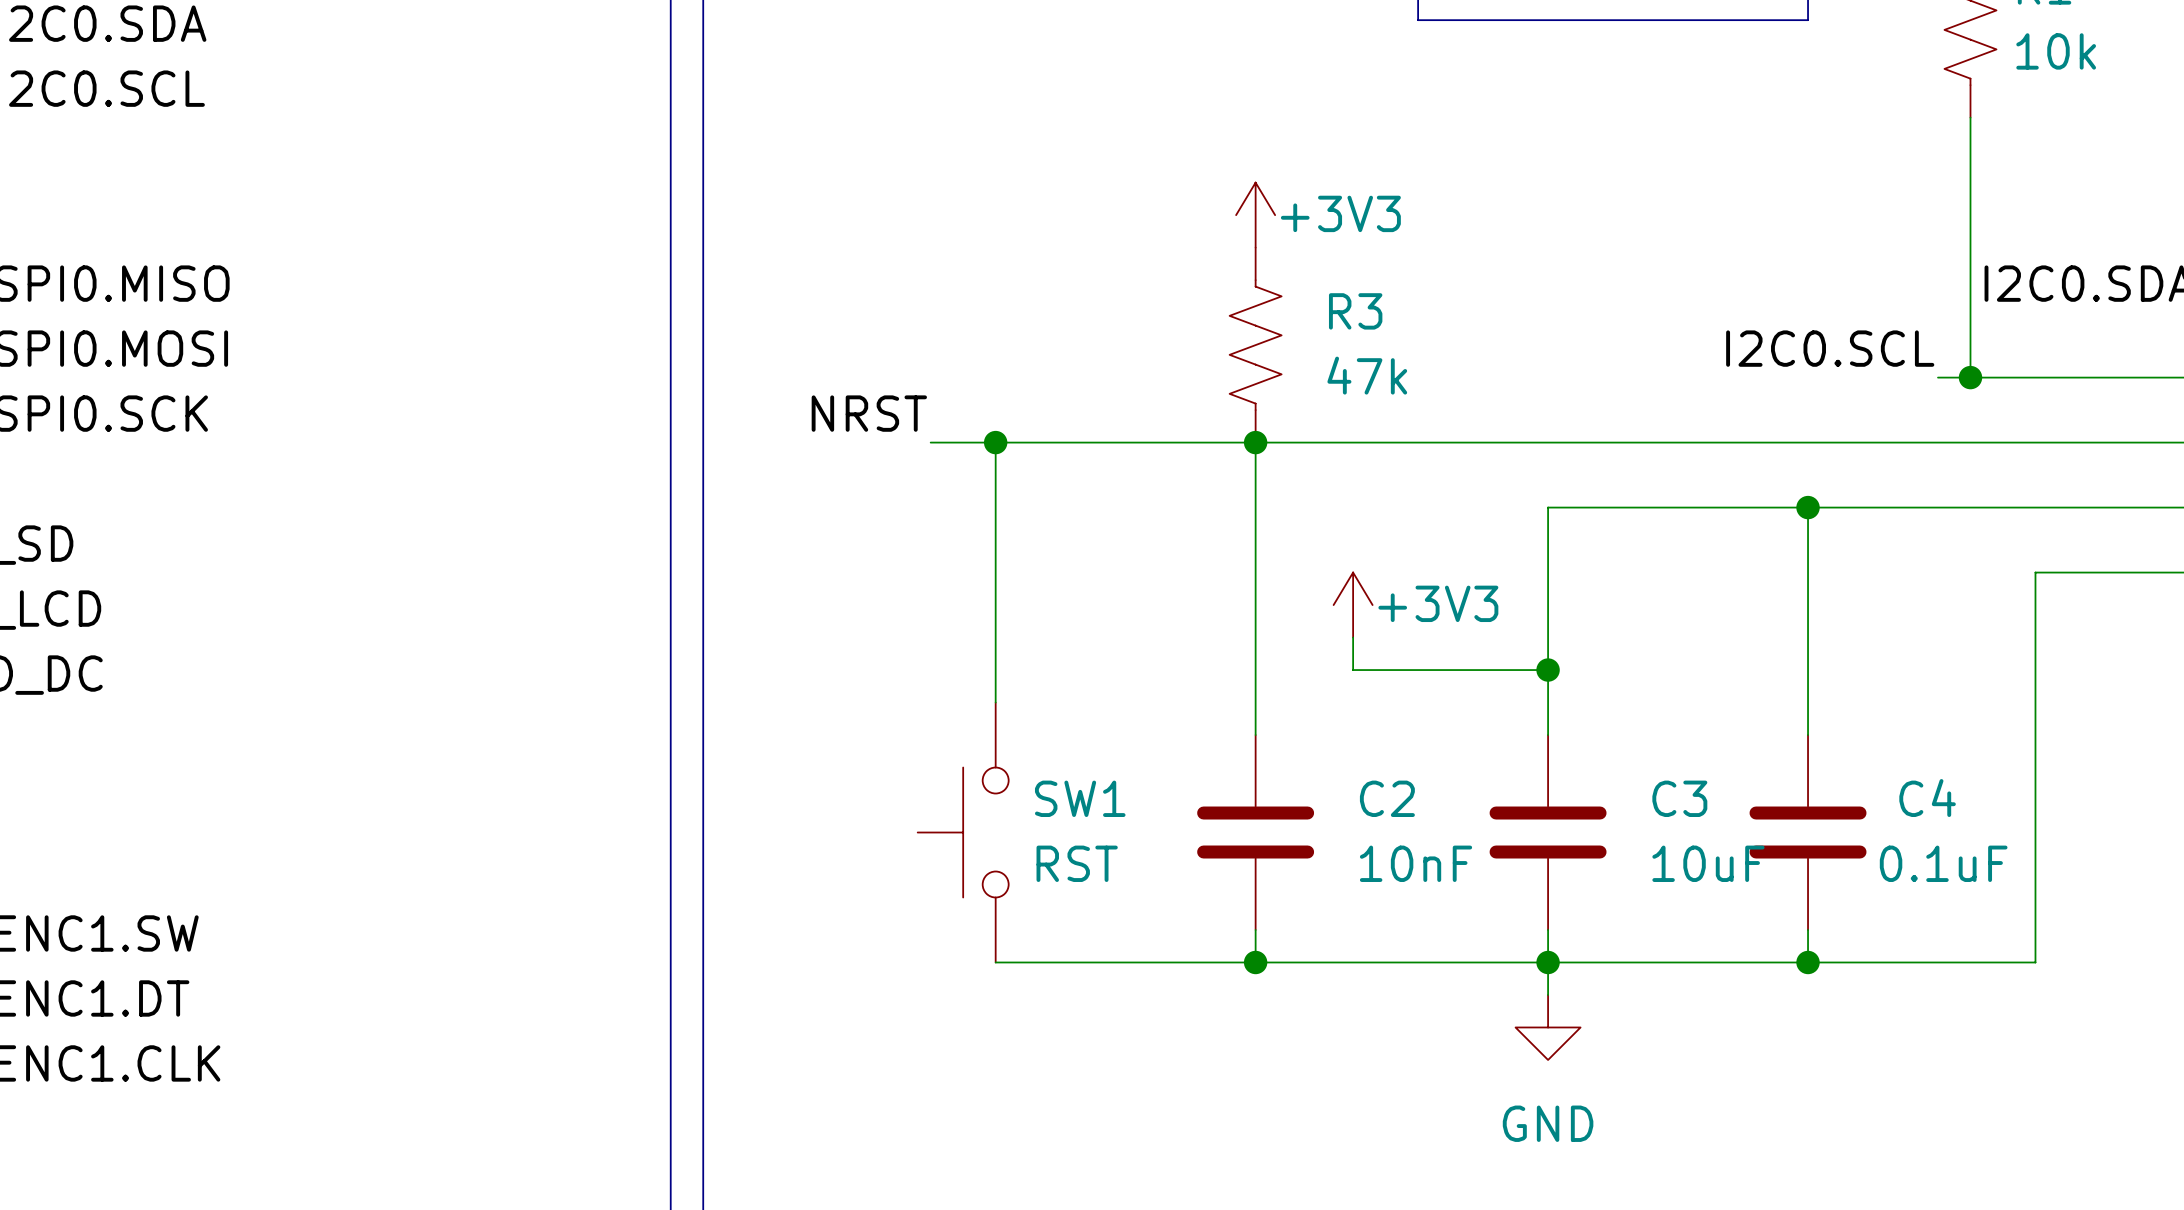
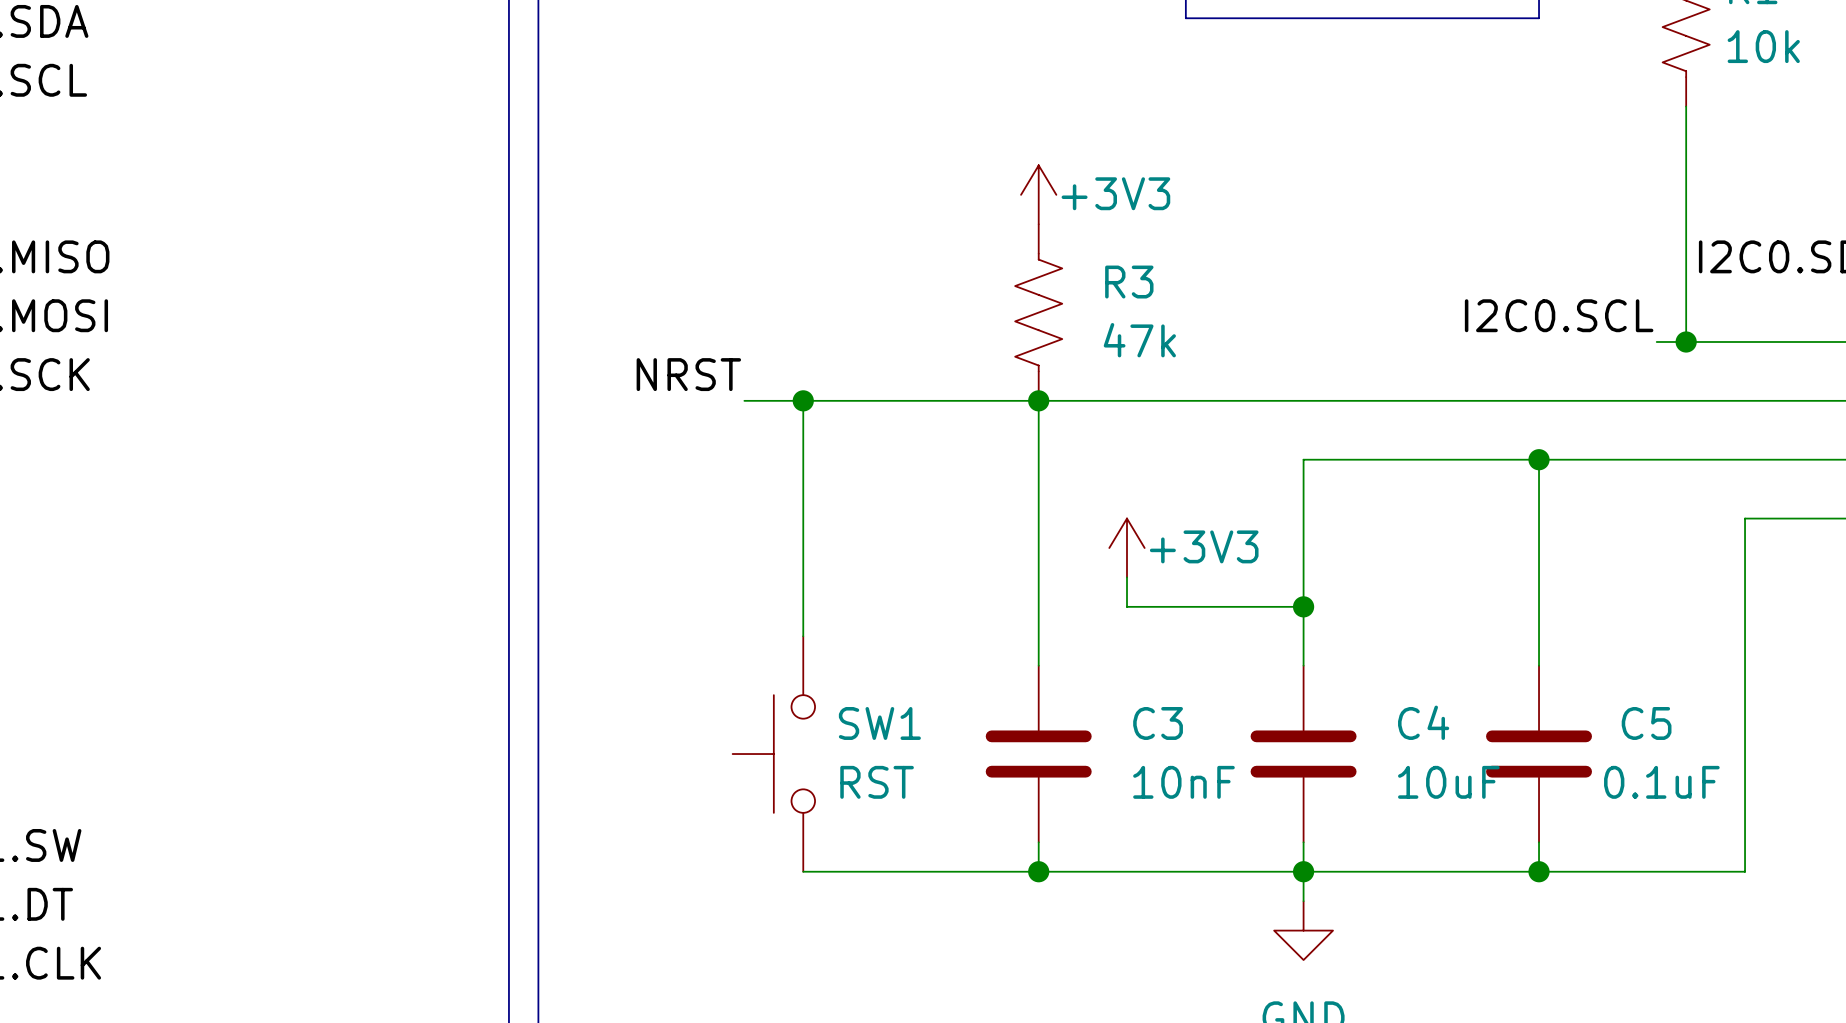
C2 name: C2 (1387, 798) -> C3 (1158, 723)
C3 name: C3 (1679, 798) -> C4 (1423, 722)
C4 name: C4 (1927, 798) -> C5 (1646, 723)

